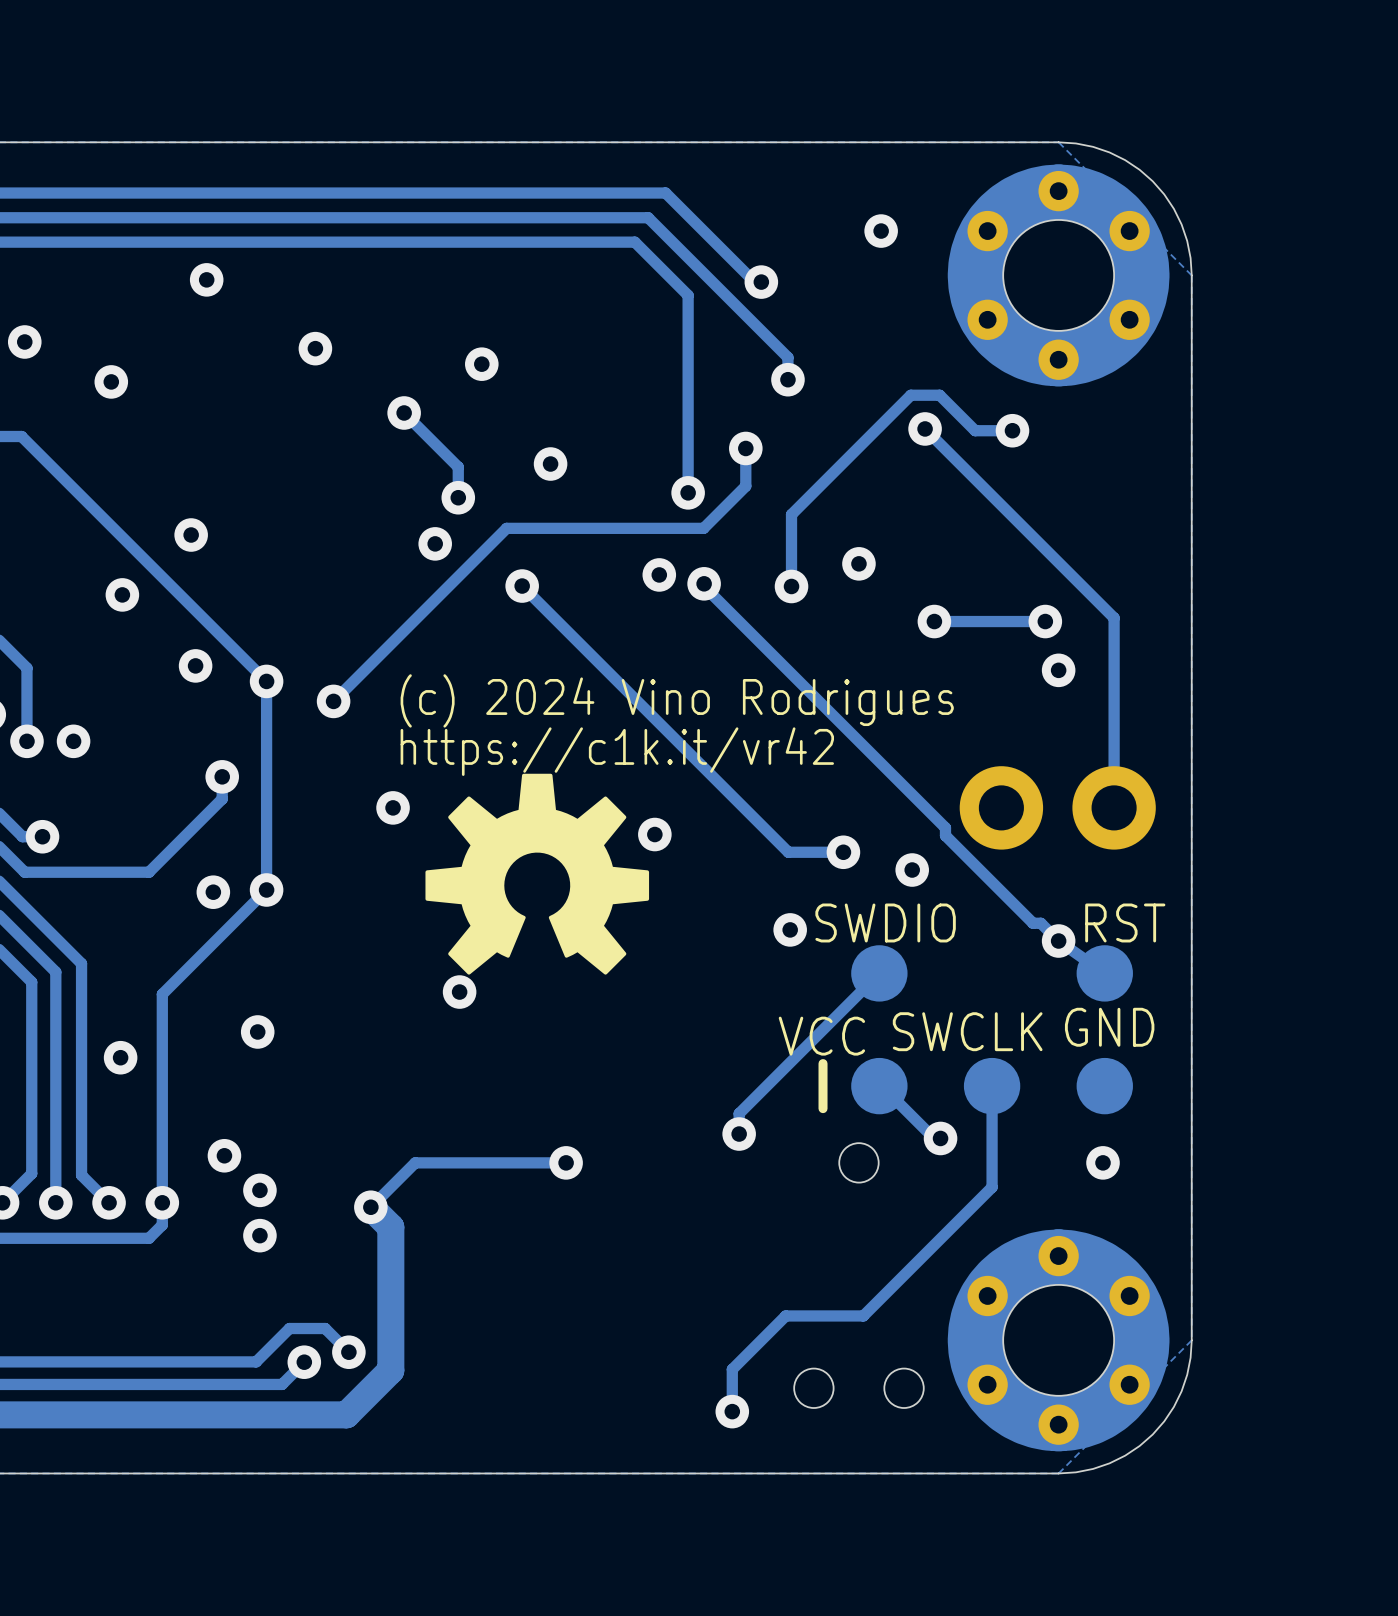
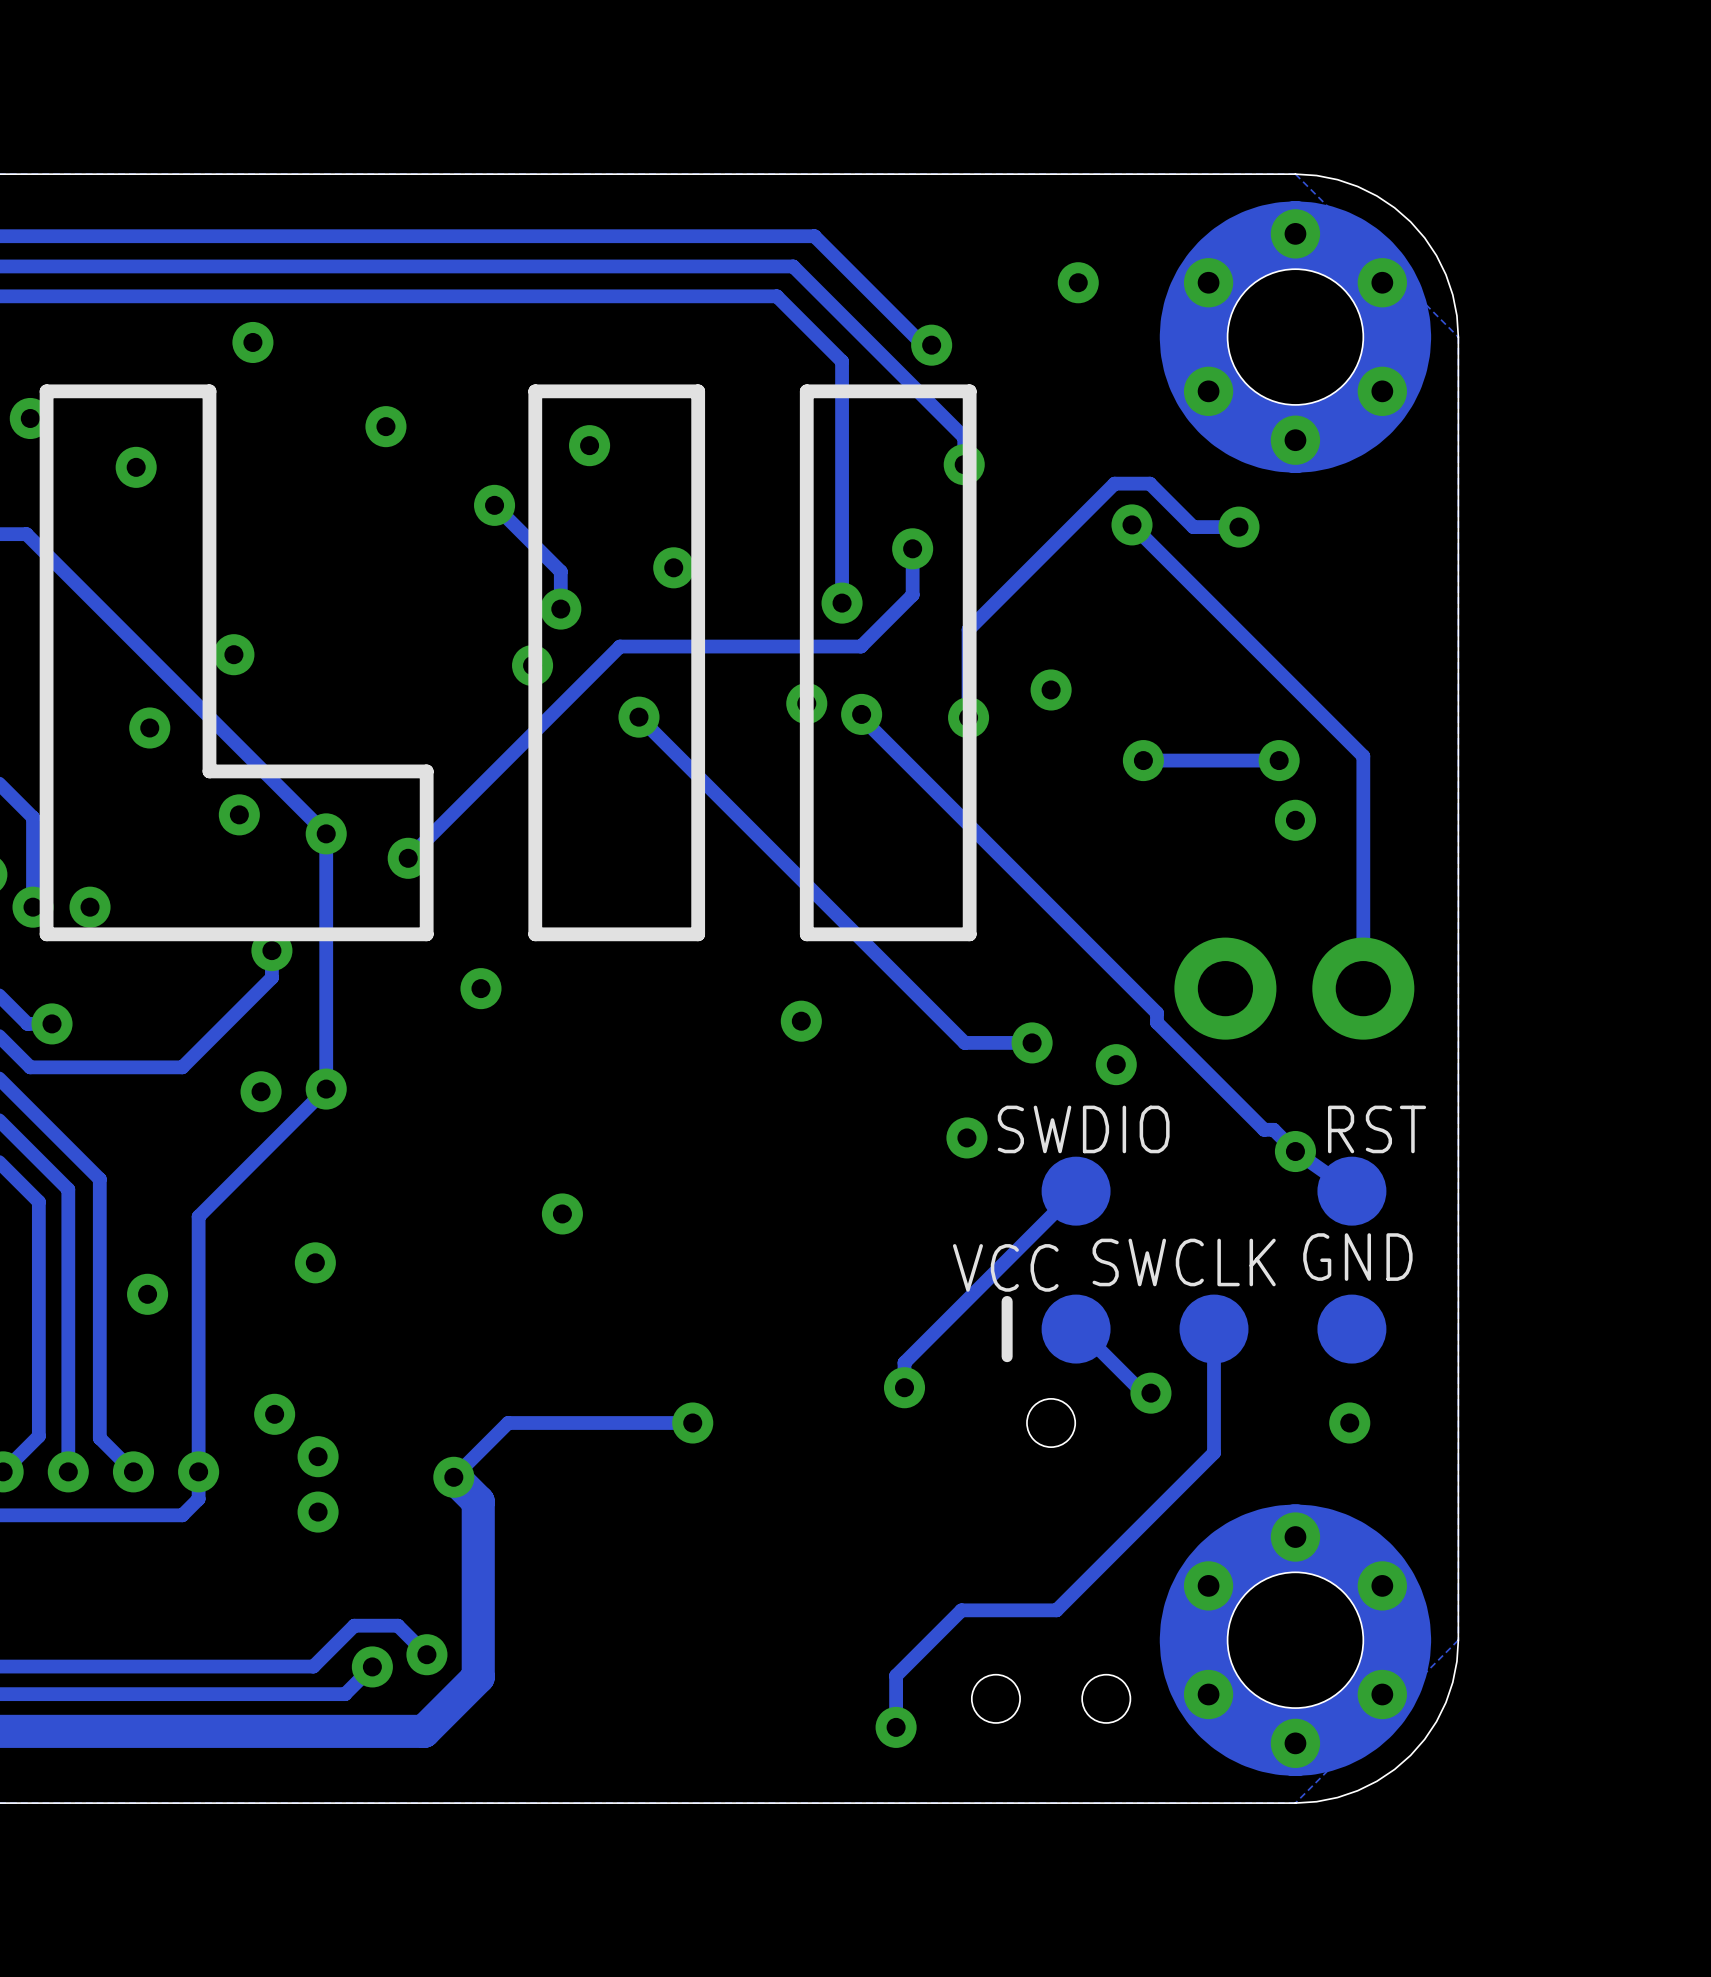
line: none -> (209, 391) (209, 771) (426, 771) (426, 934) (46, 934) (46, 391) (209, 391)
line: none -> (698, 391) (535, 391) (535, 934) (698, 934) (698, 391)
line: none -> (969, 391) (806, 391) (806, 934) (969, 934) (969, 391)
text: (c) 2024 Vino Rodrigues (677, 700) -> none
text: https://c1k.it/vr42 (617, 751) -> none
drawing: [425, 773, 650, 975] -> none

